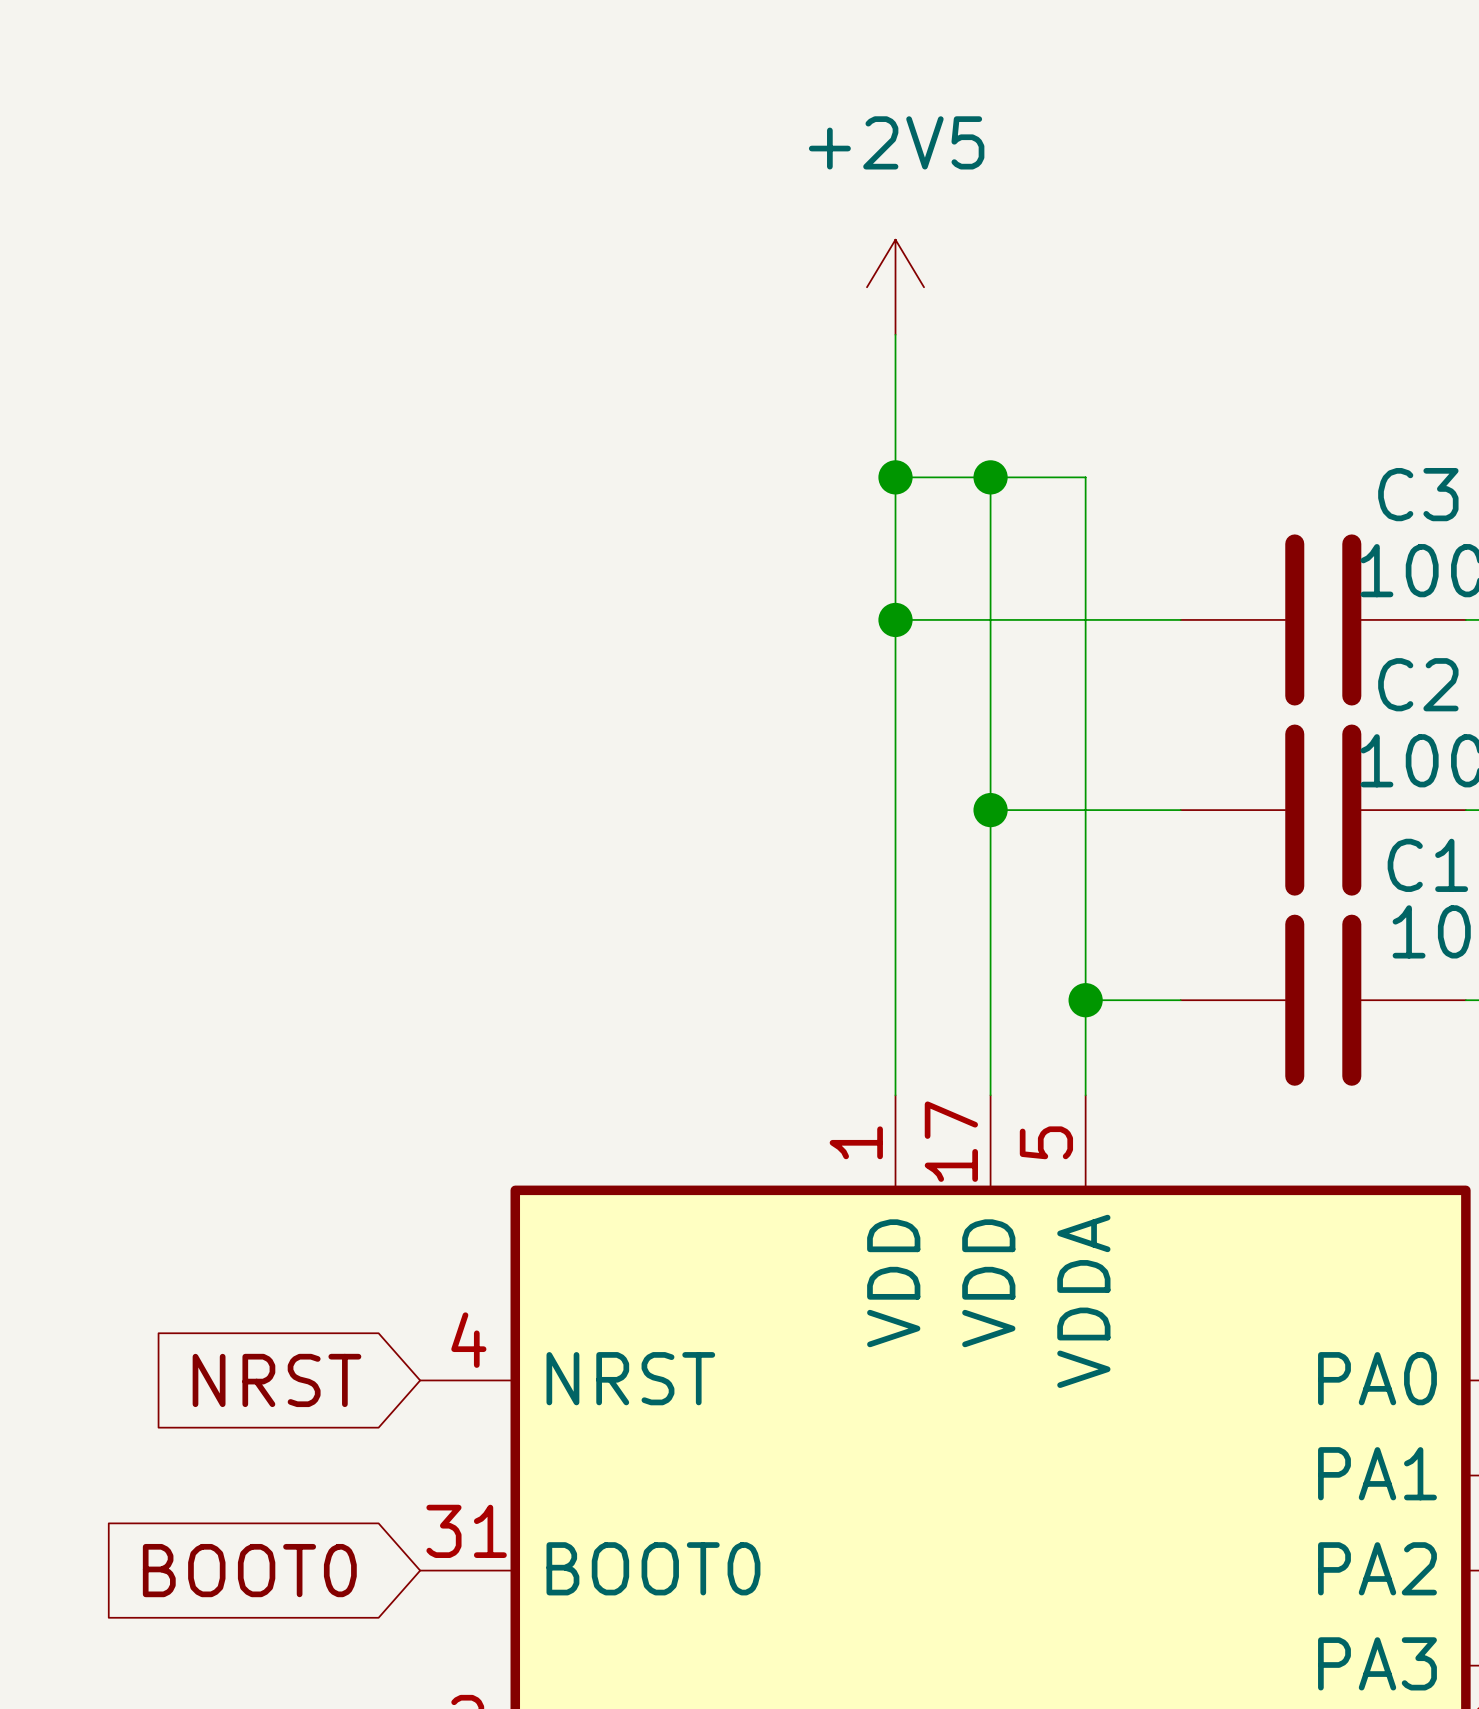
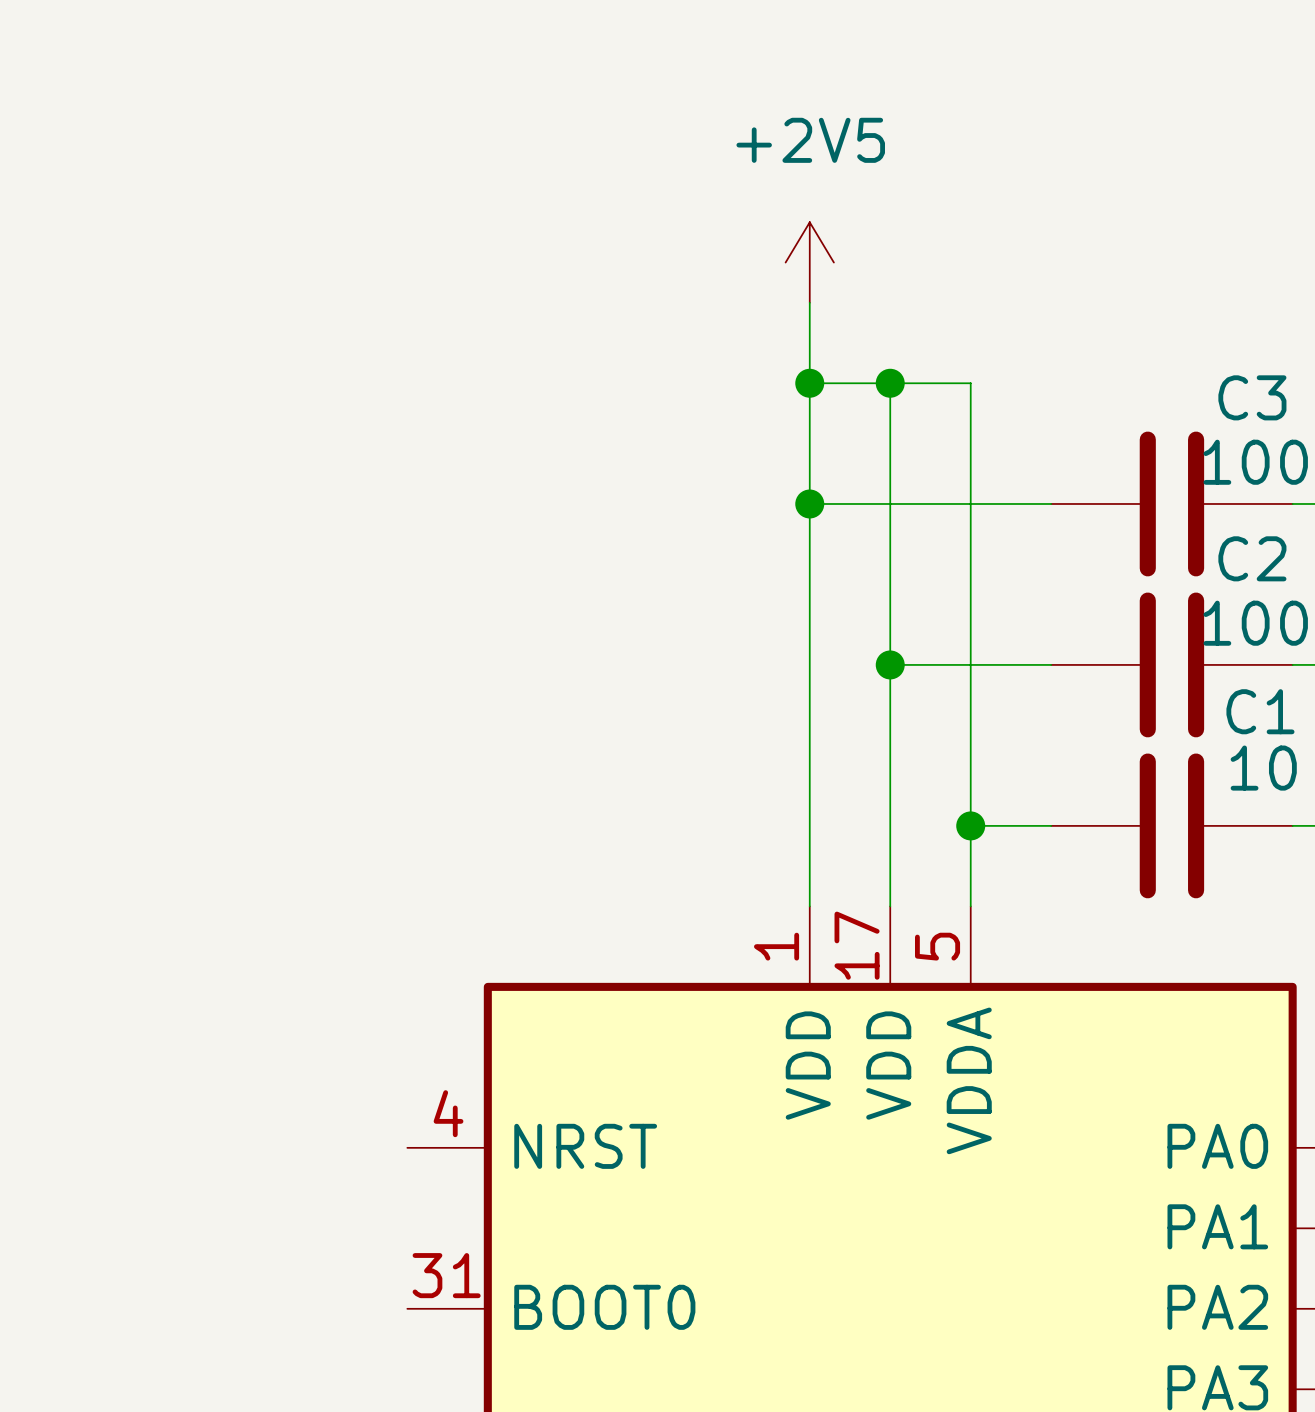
power symbol position: +2V5 (895, 287) -> +2V5 (809, 262)
global label: NRST (276, 1380) -> none
global label: BOOT0 (249, 1570) -> none

